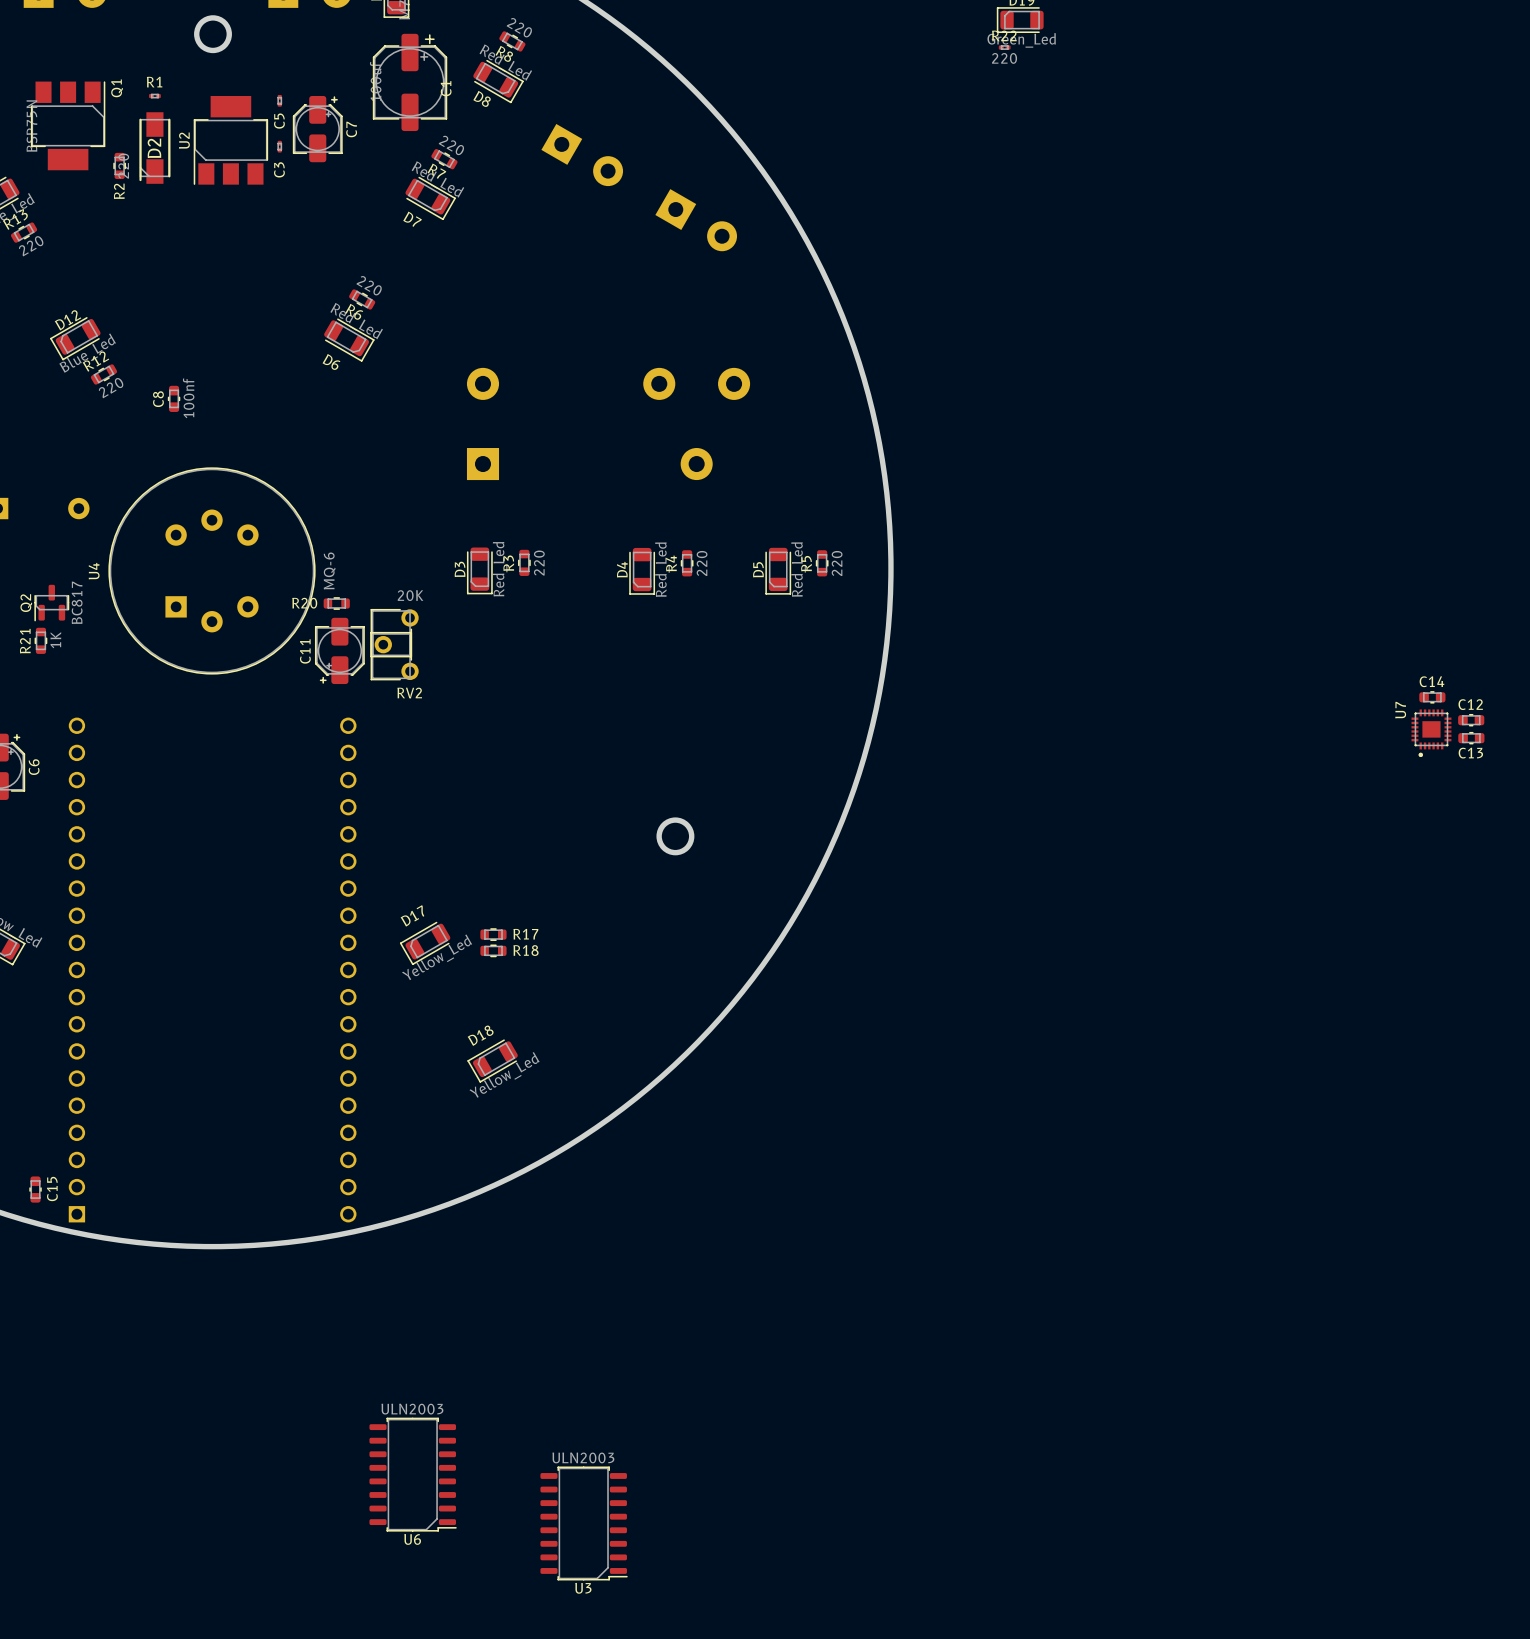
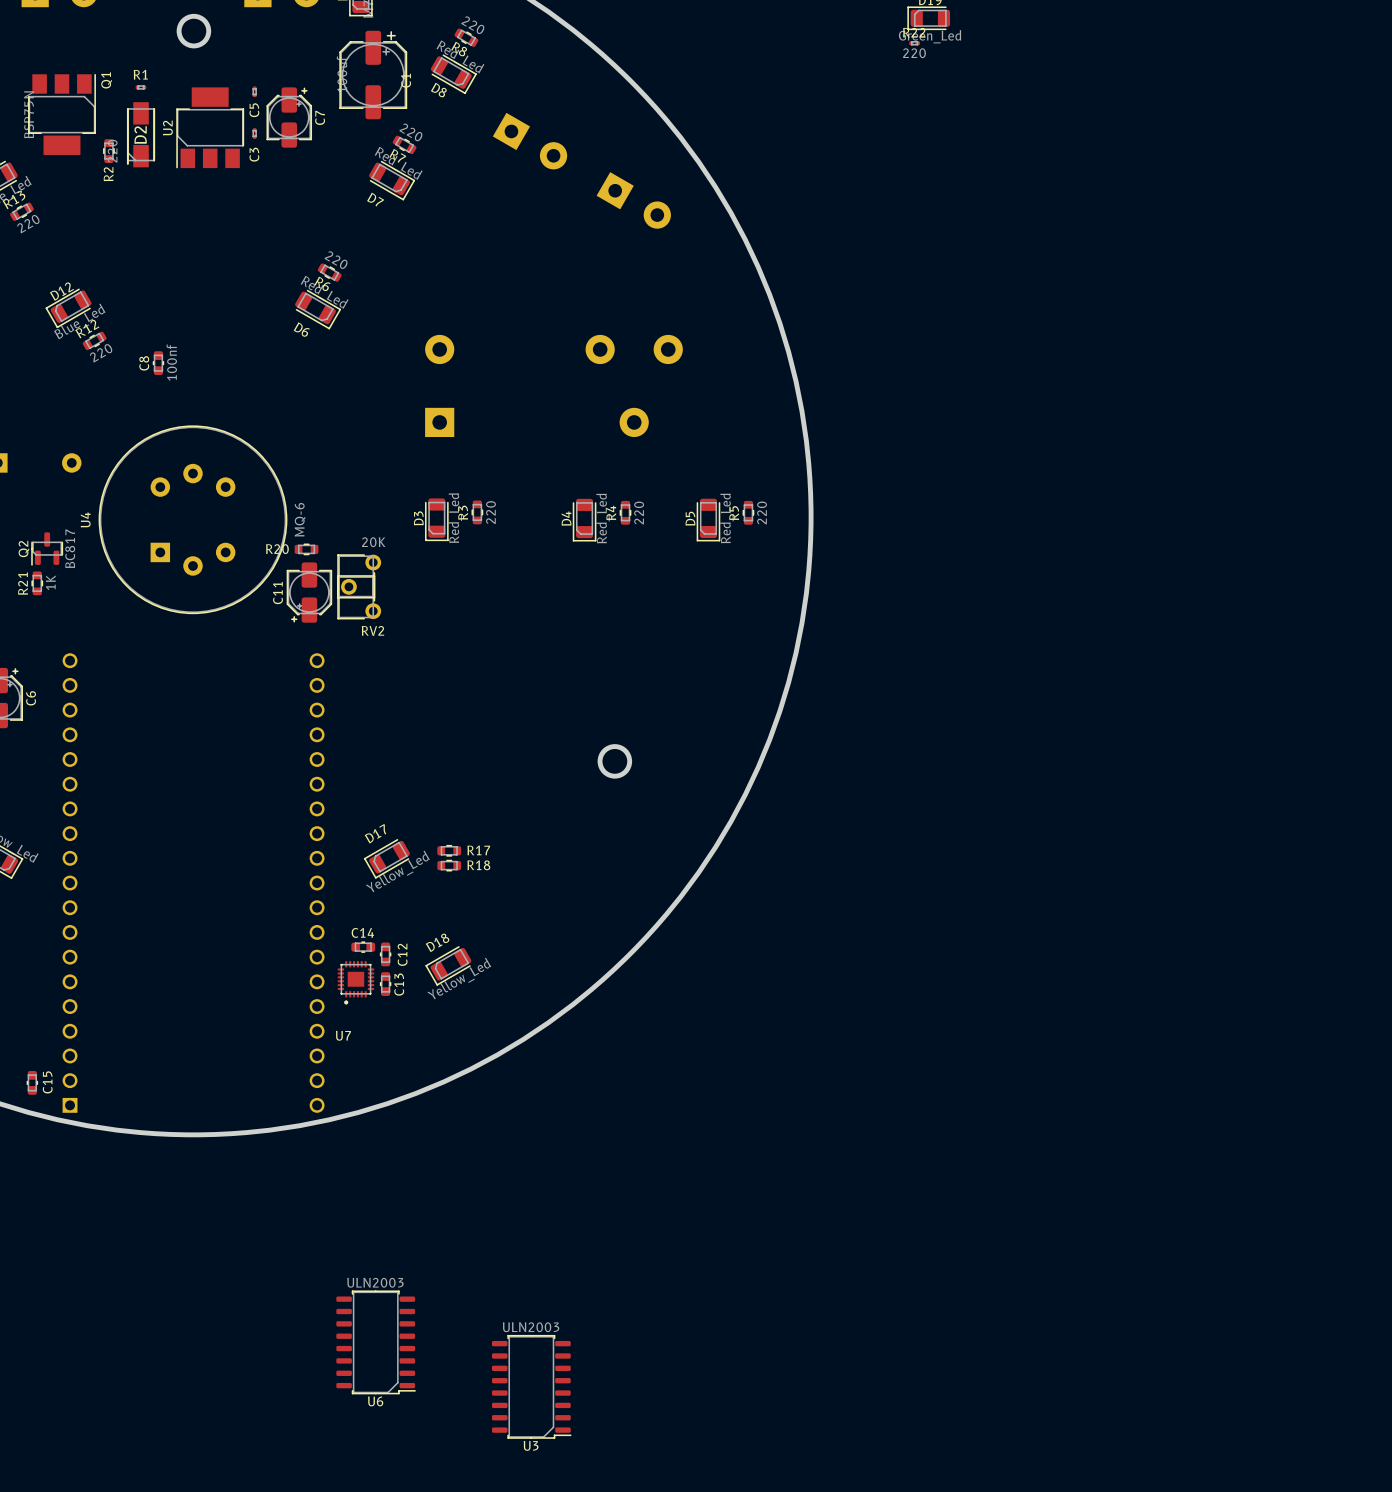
C14 position: (1432, 697) -> (363, 947)
U7 name rotation: 0° (1400, 710) -> 90° clockwise (343, 1035)
U7 name position: U7 (1400, 710) -> U7 (343, 1035)
C12 rotation: 0° (1471, 720) -> 90° clockwise (385, 954)
C12 position: (1471, 720) -> (385, 954)
U7 position: (1431, 733) -> (355, 982)
C13 rotation: 0° (1471, 738) -> 90° clockwise (385, 984)
C13 position: (1471, 738) -> (385, 984)
C13 name position: C13 (1470, 753) -> C13 (399, 984)

